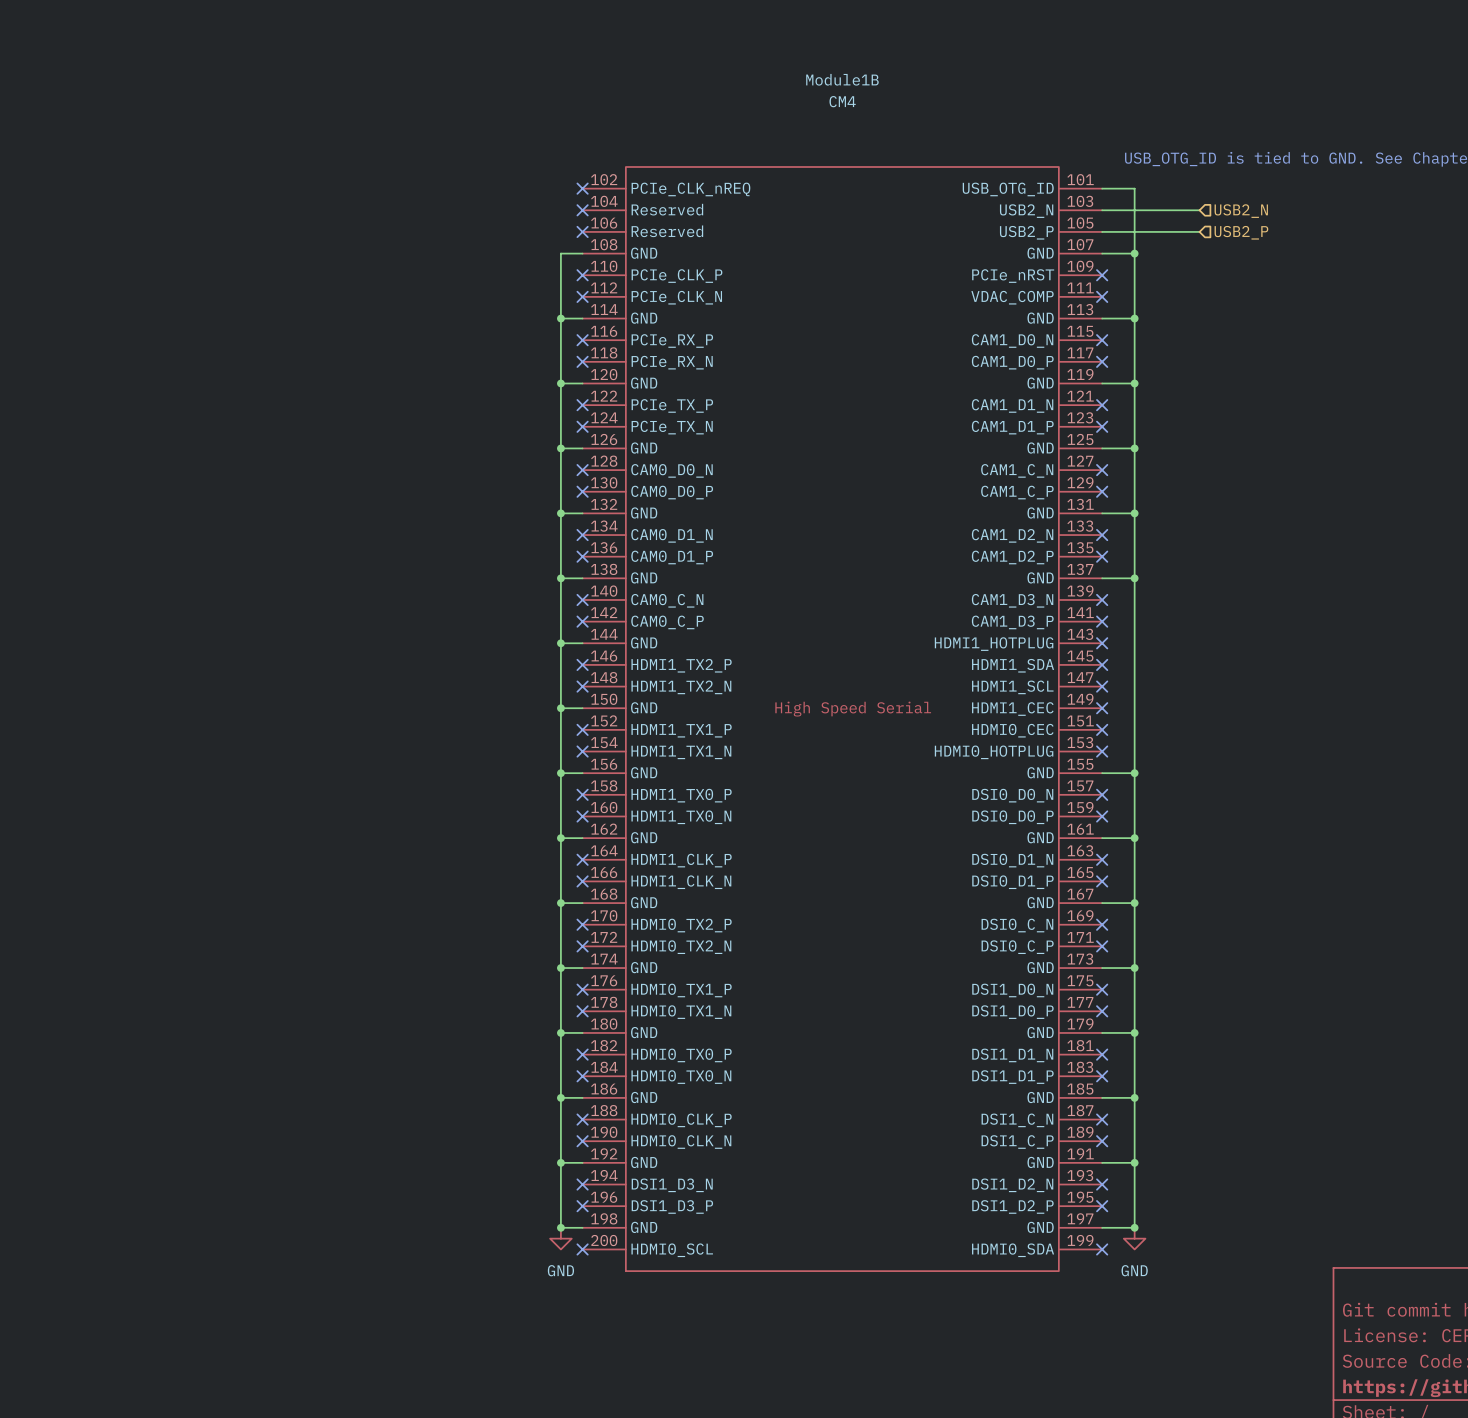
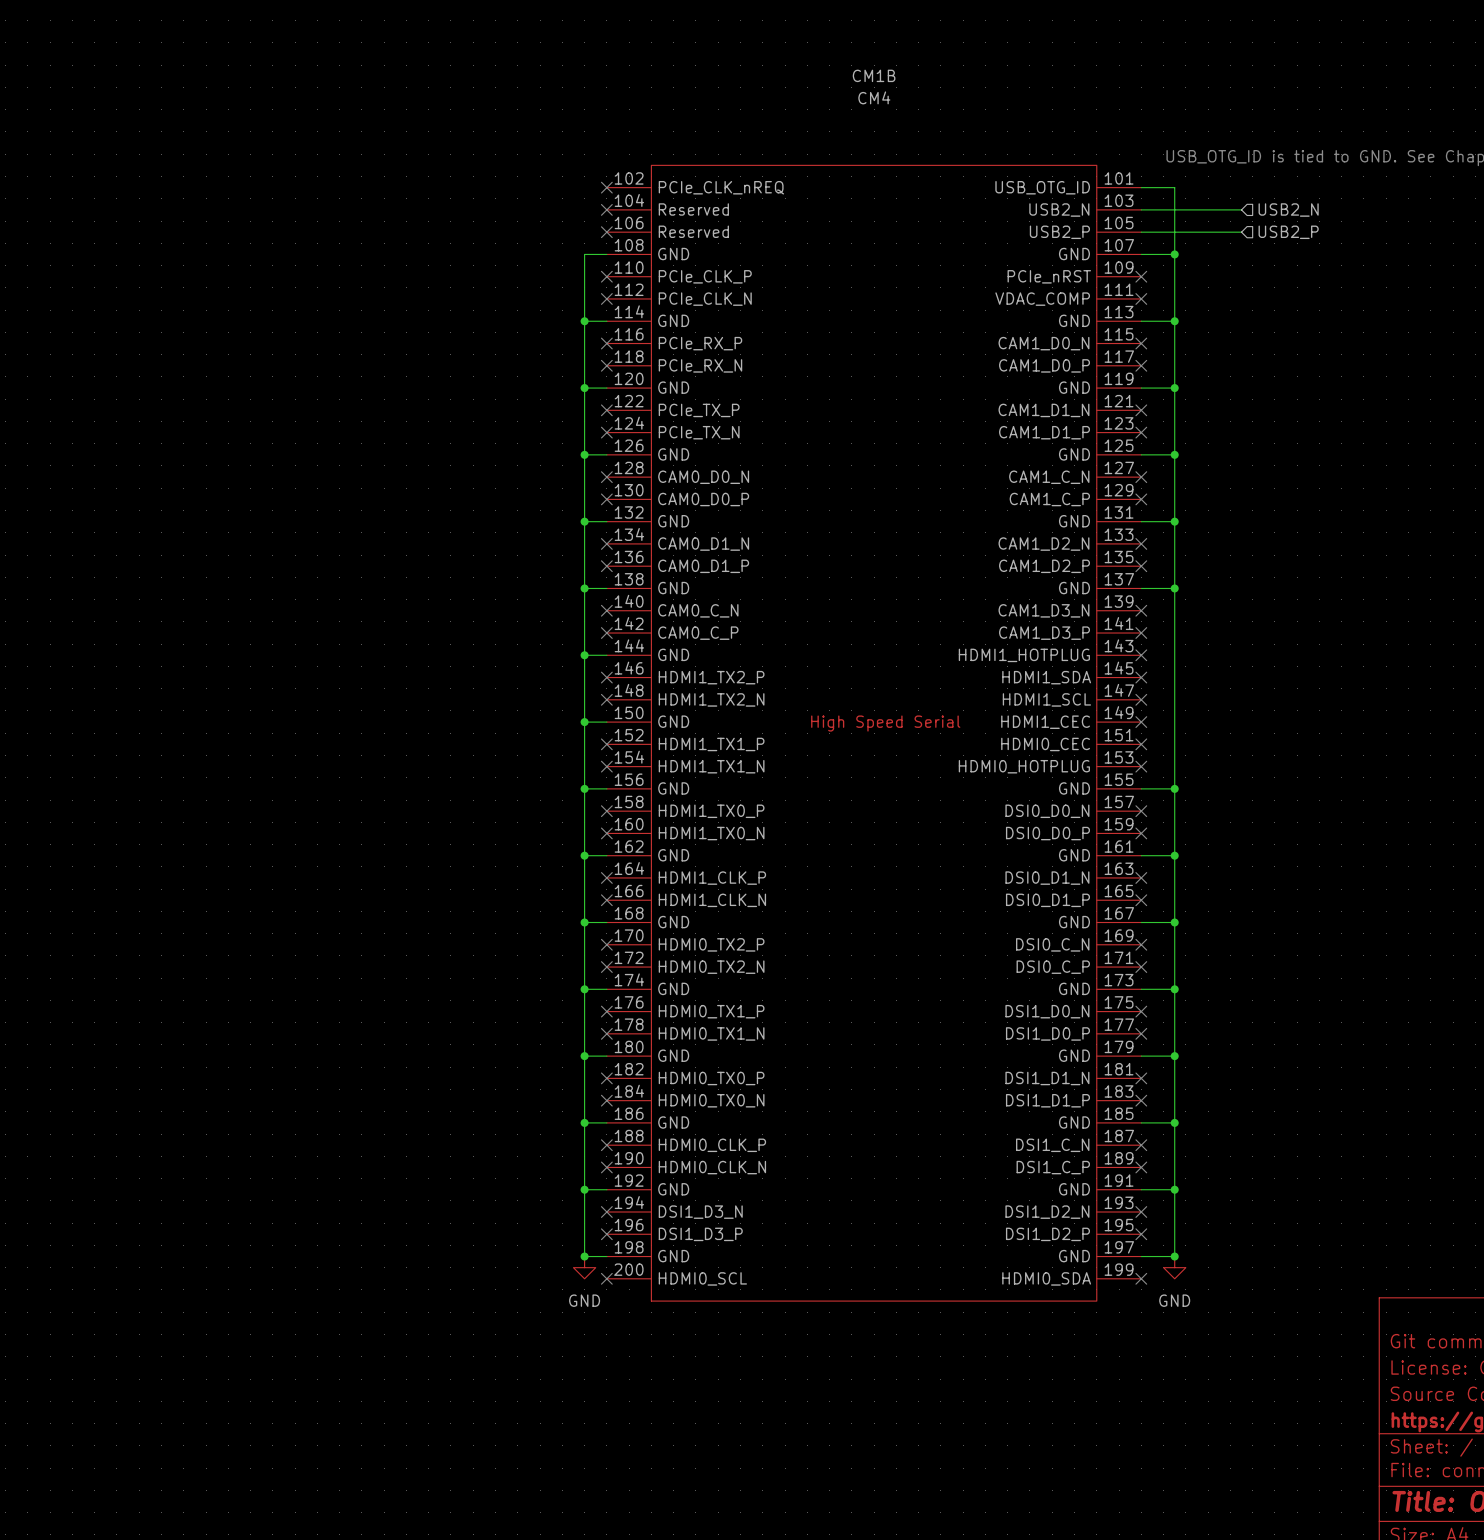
Module1B name: Module1B (842, 79) -> CM1B (874, 75)

